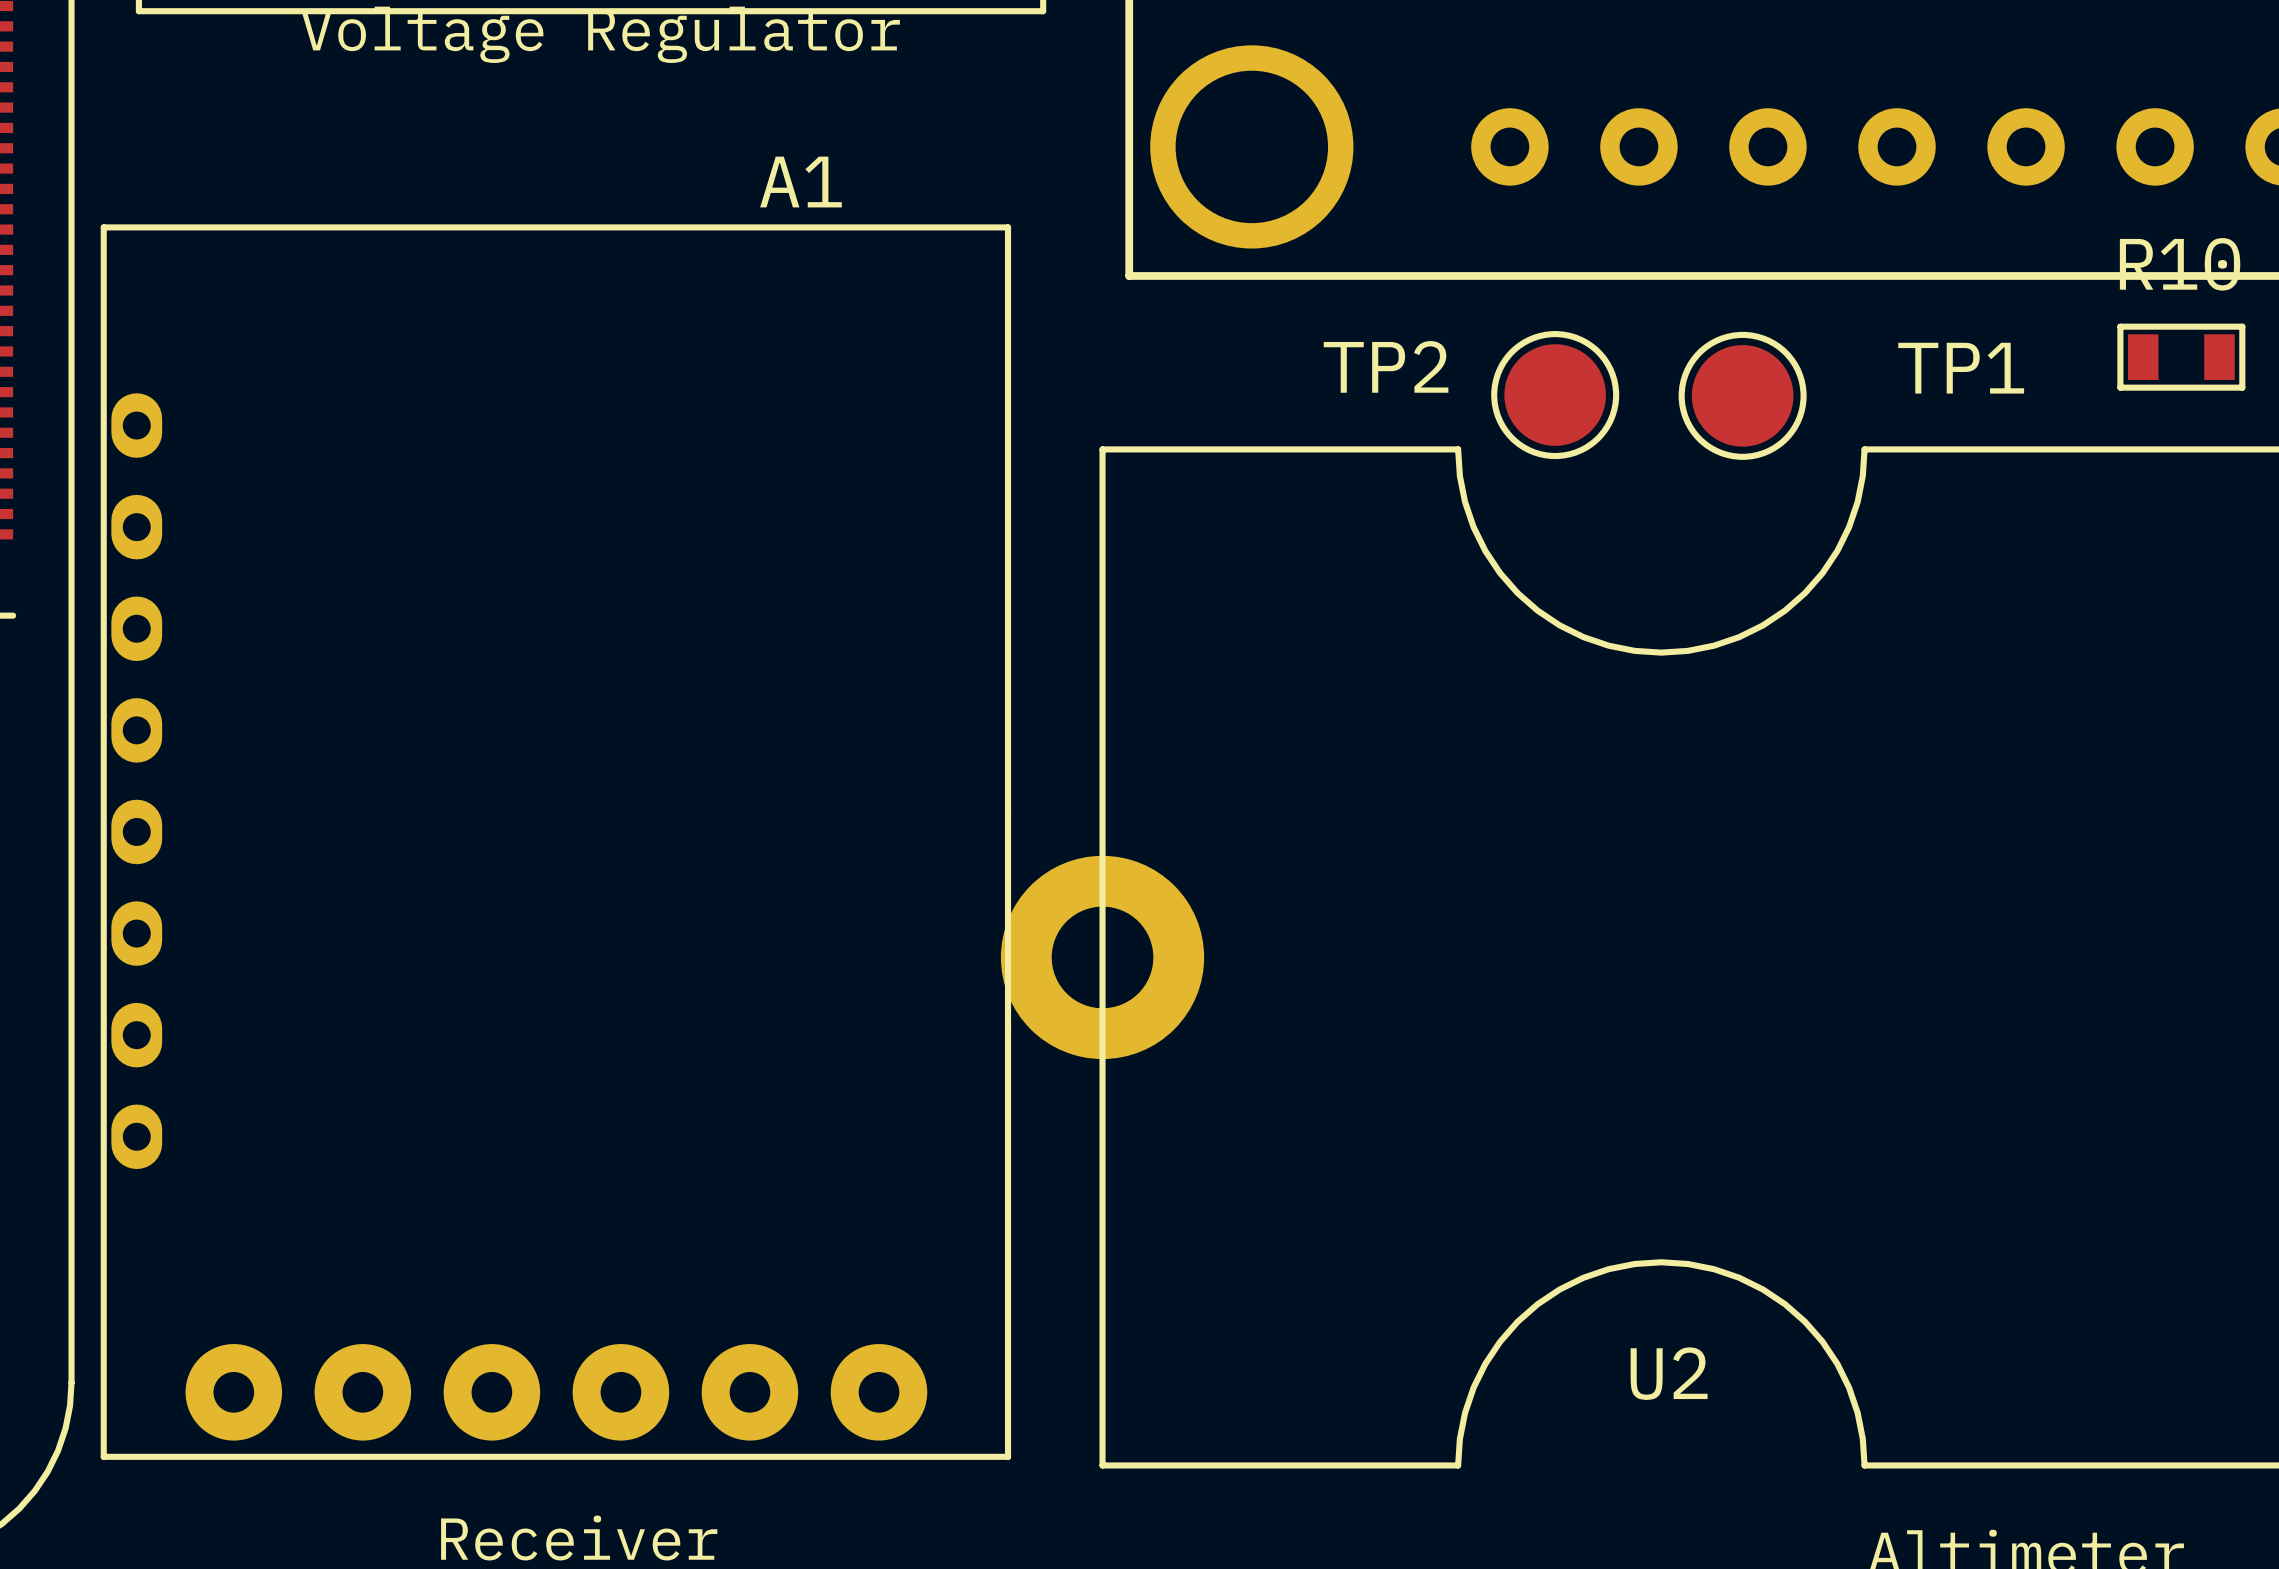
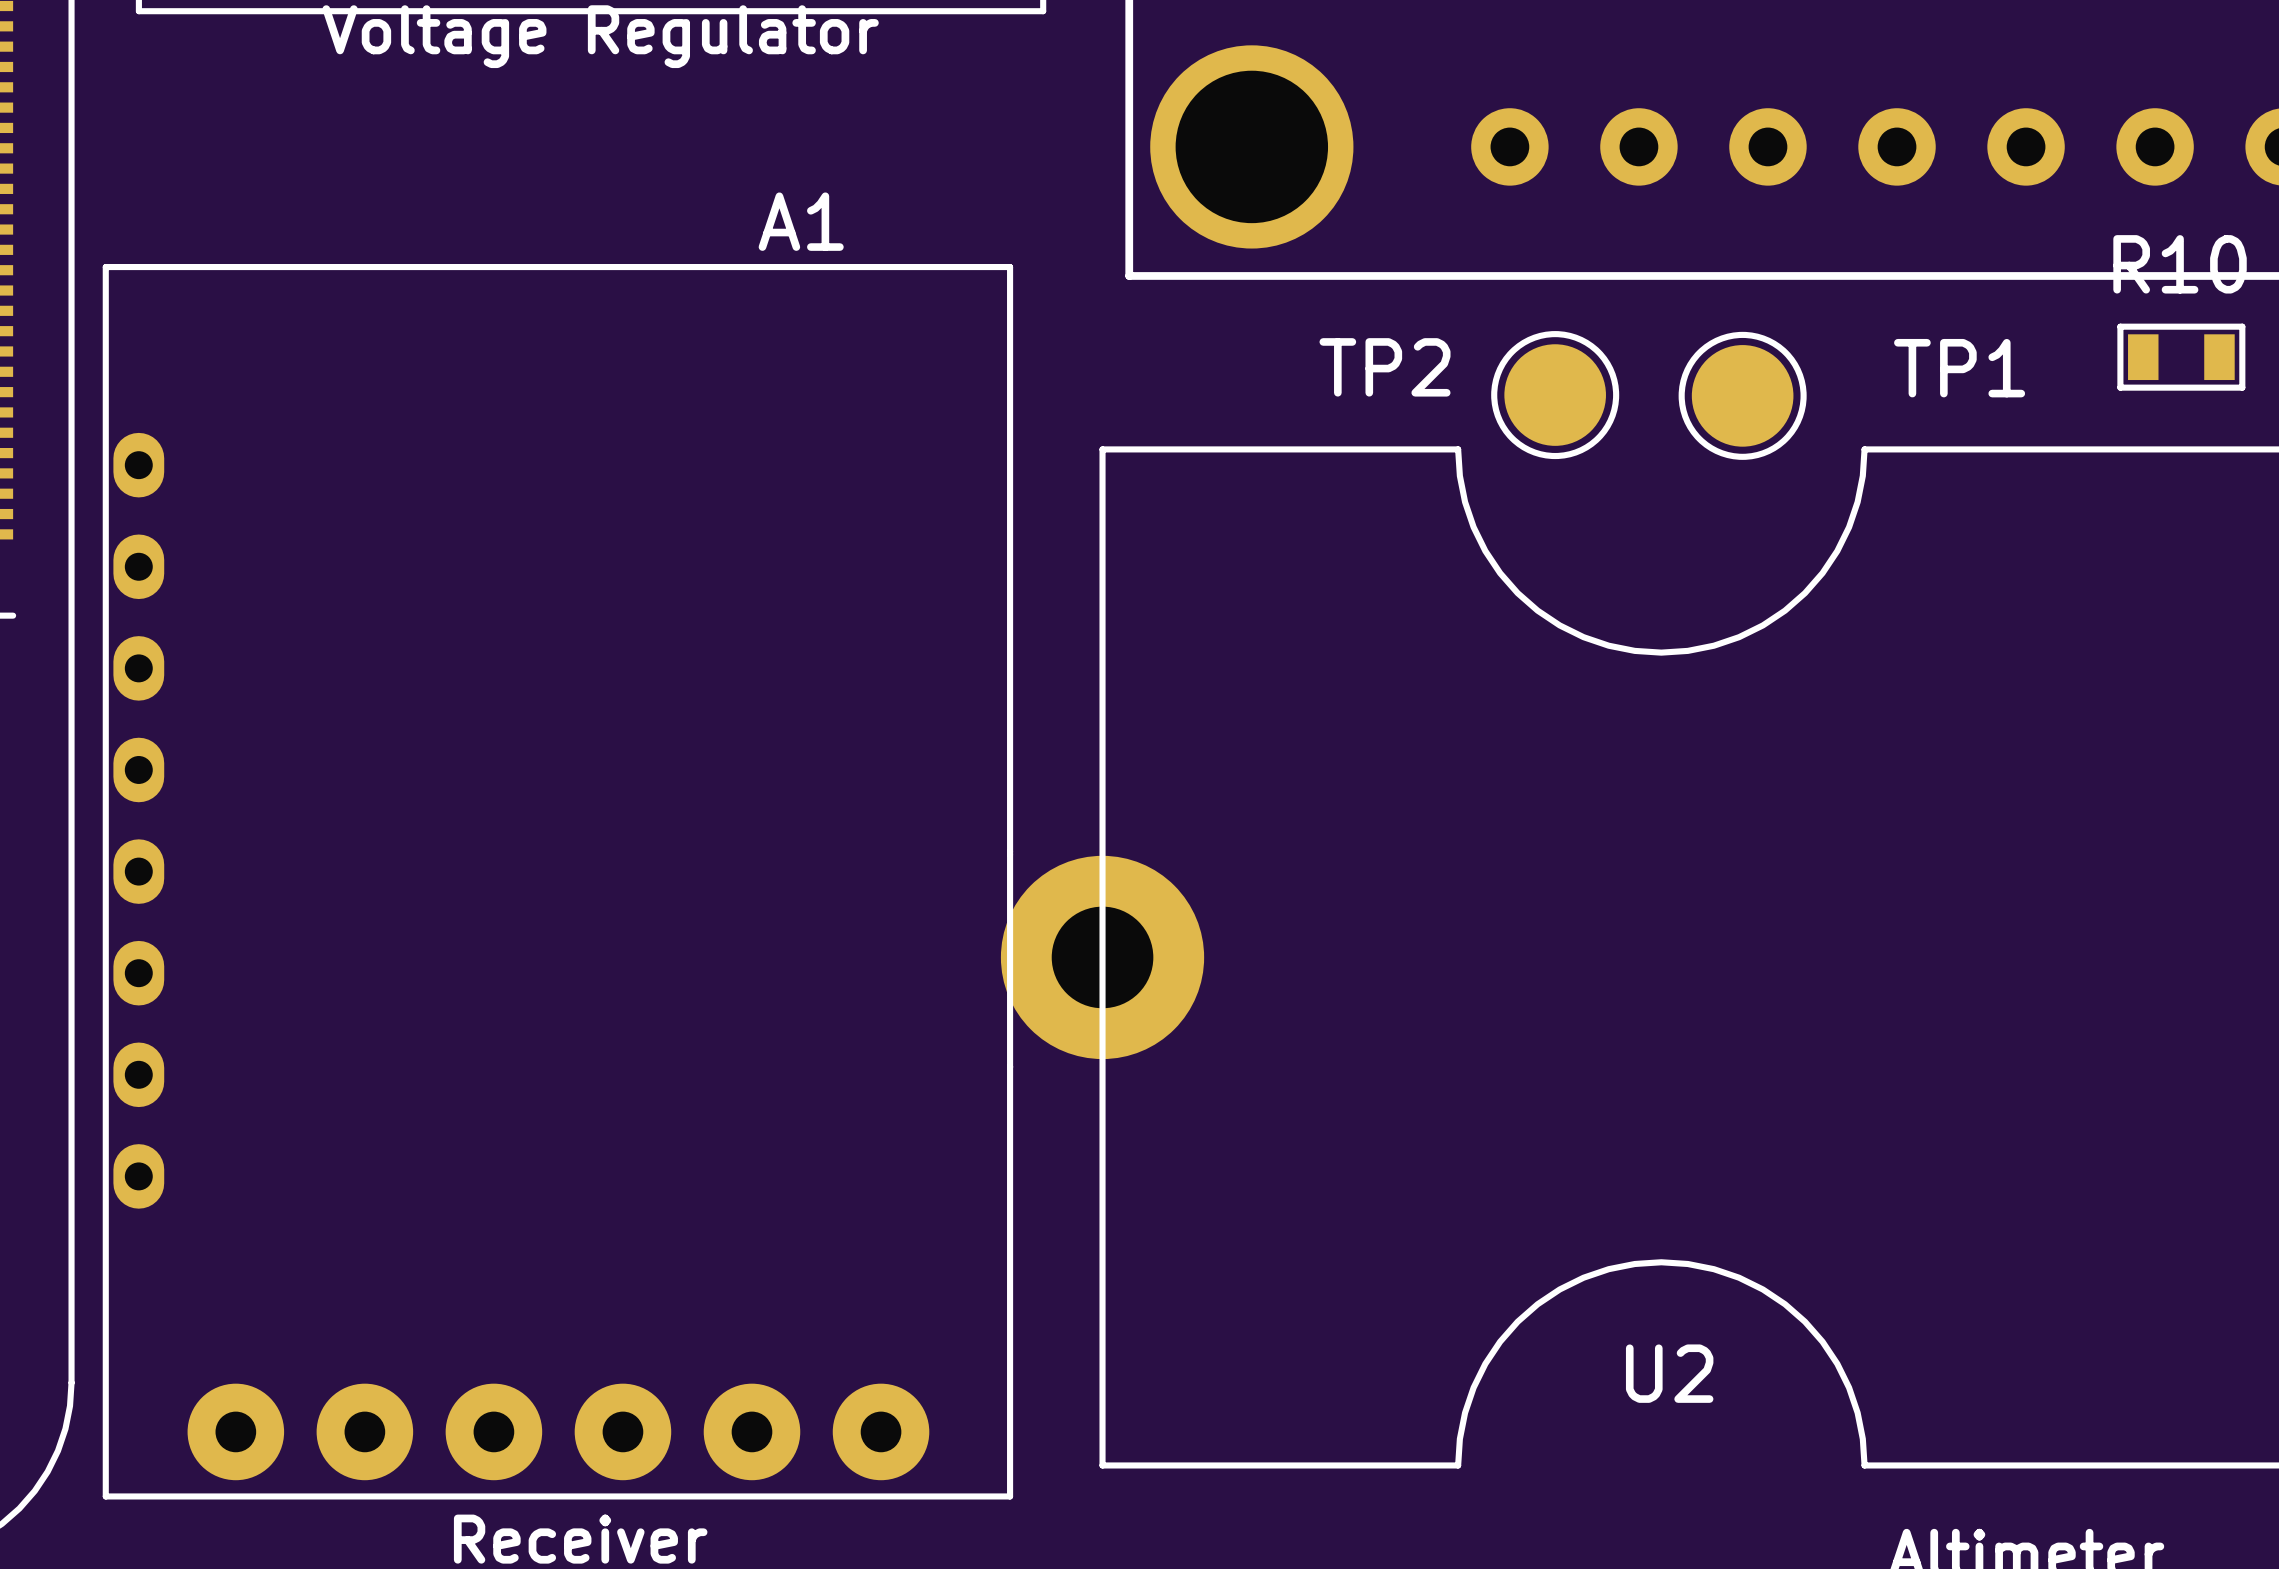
A1 position: (555, 842) -> (557, 881)

